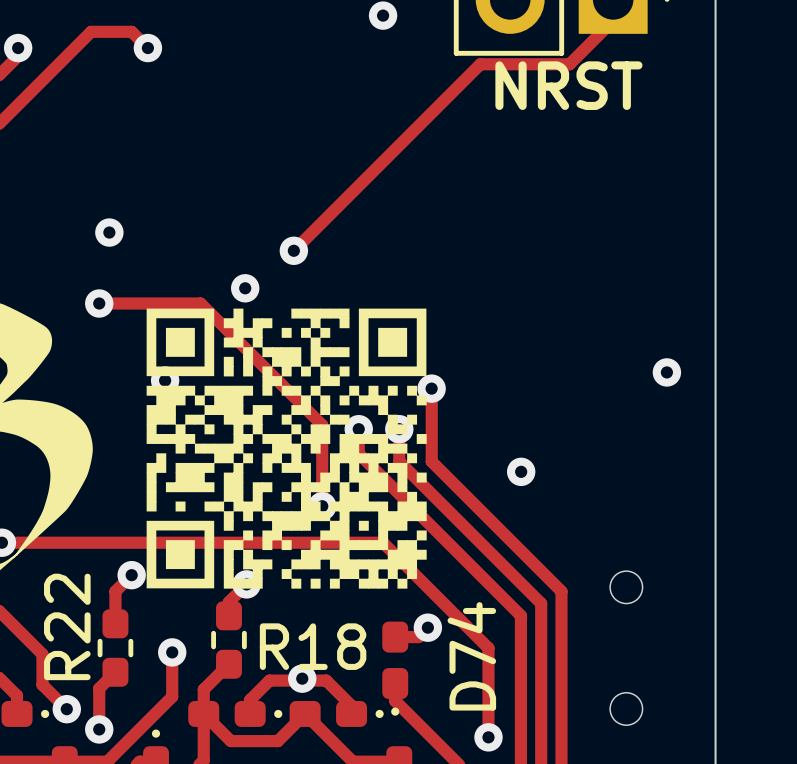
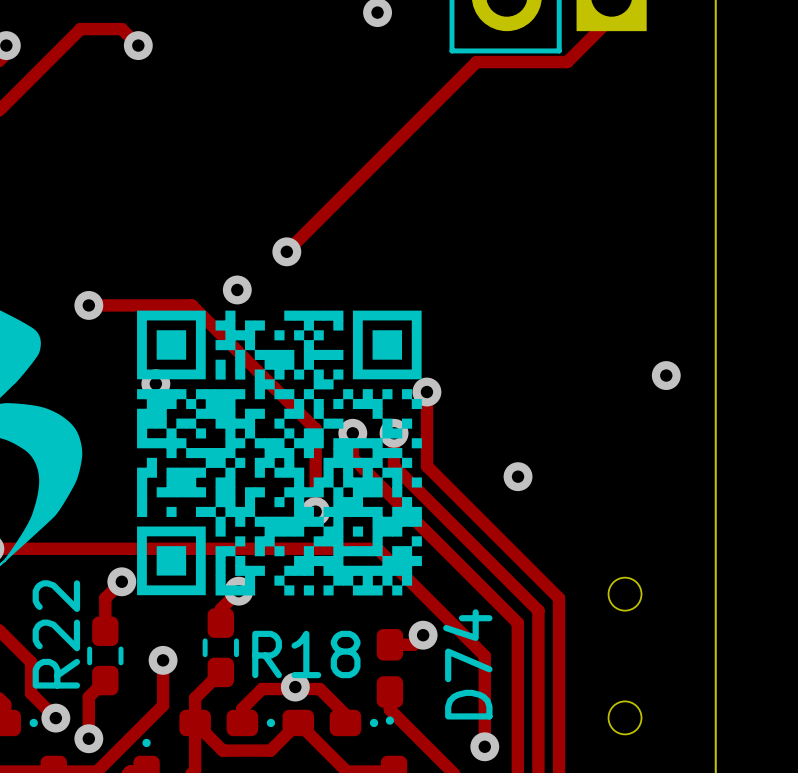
text: NRST (568, 85) -> none
via: (109, 232) -> none

